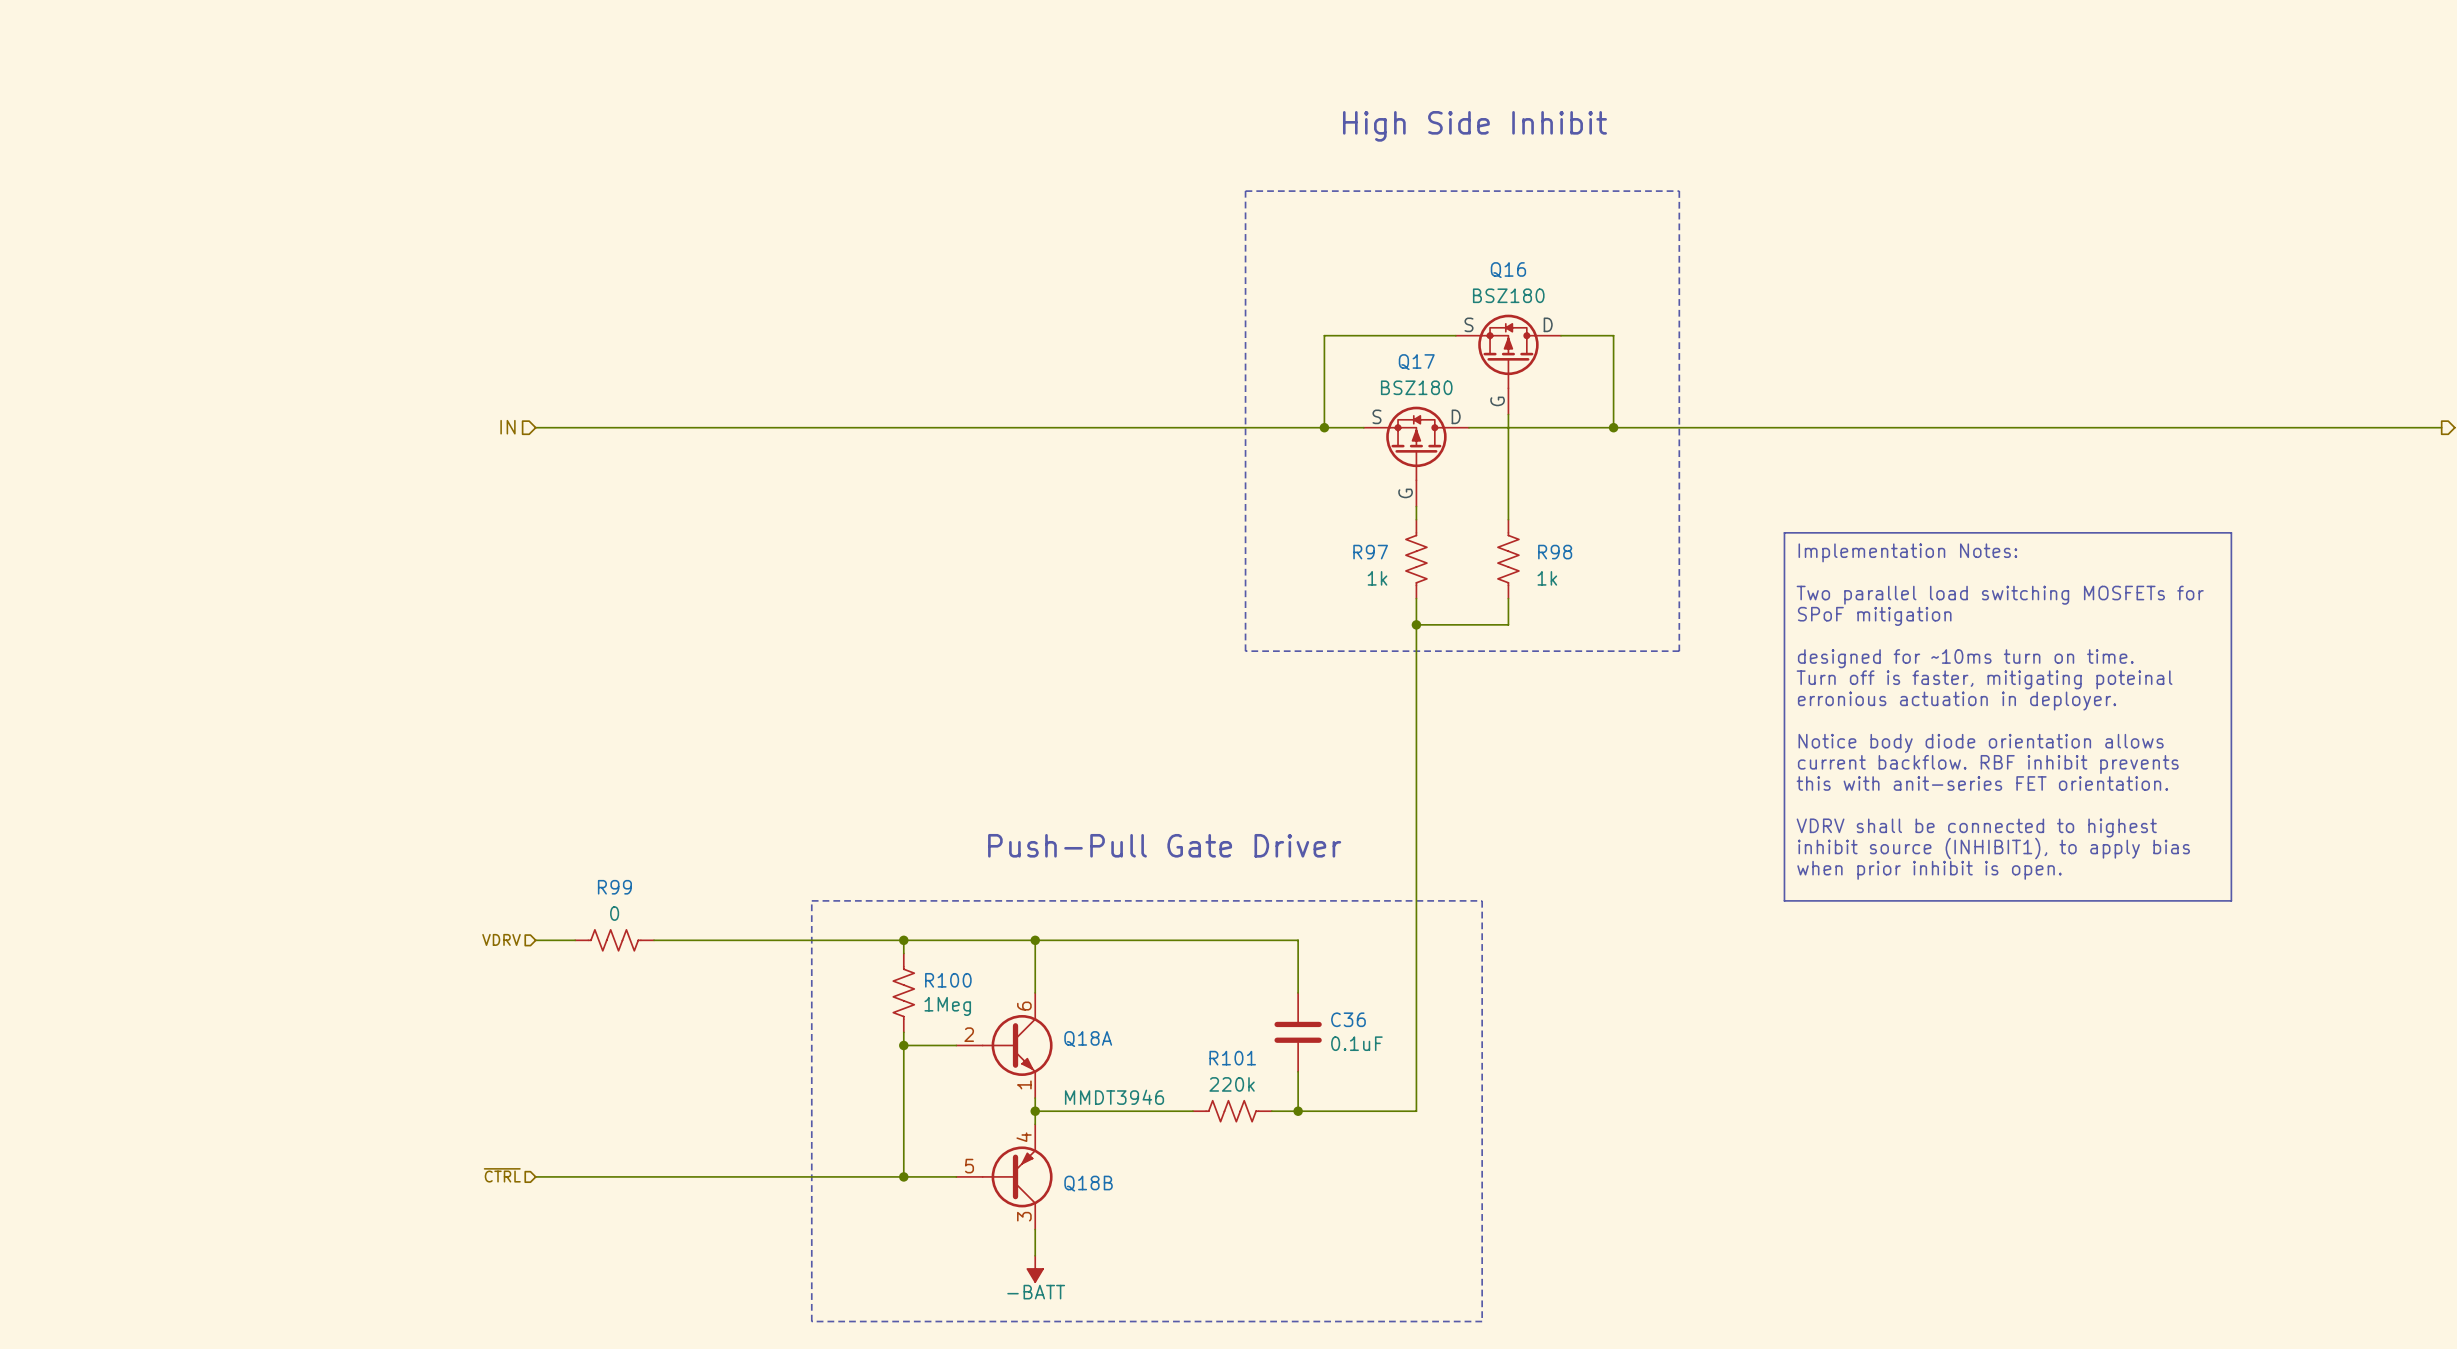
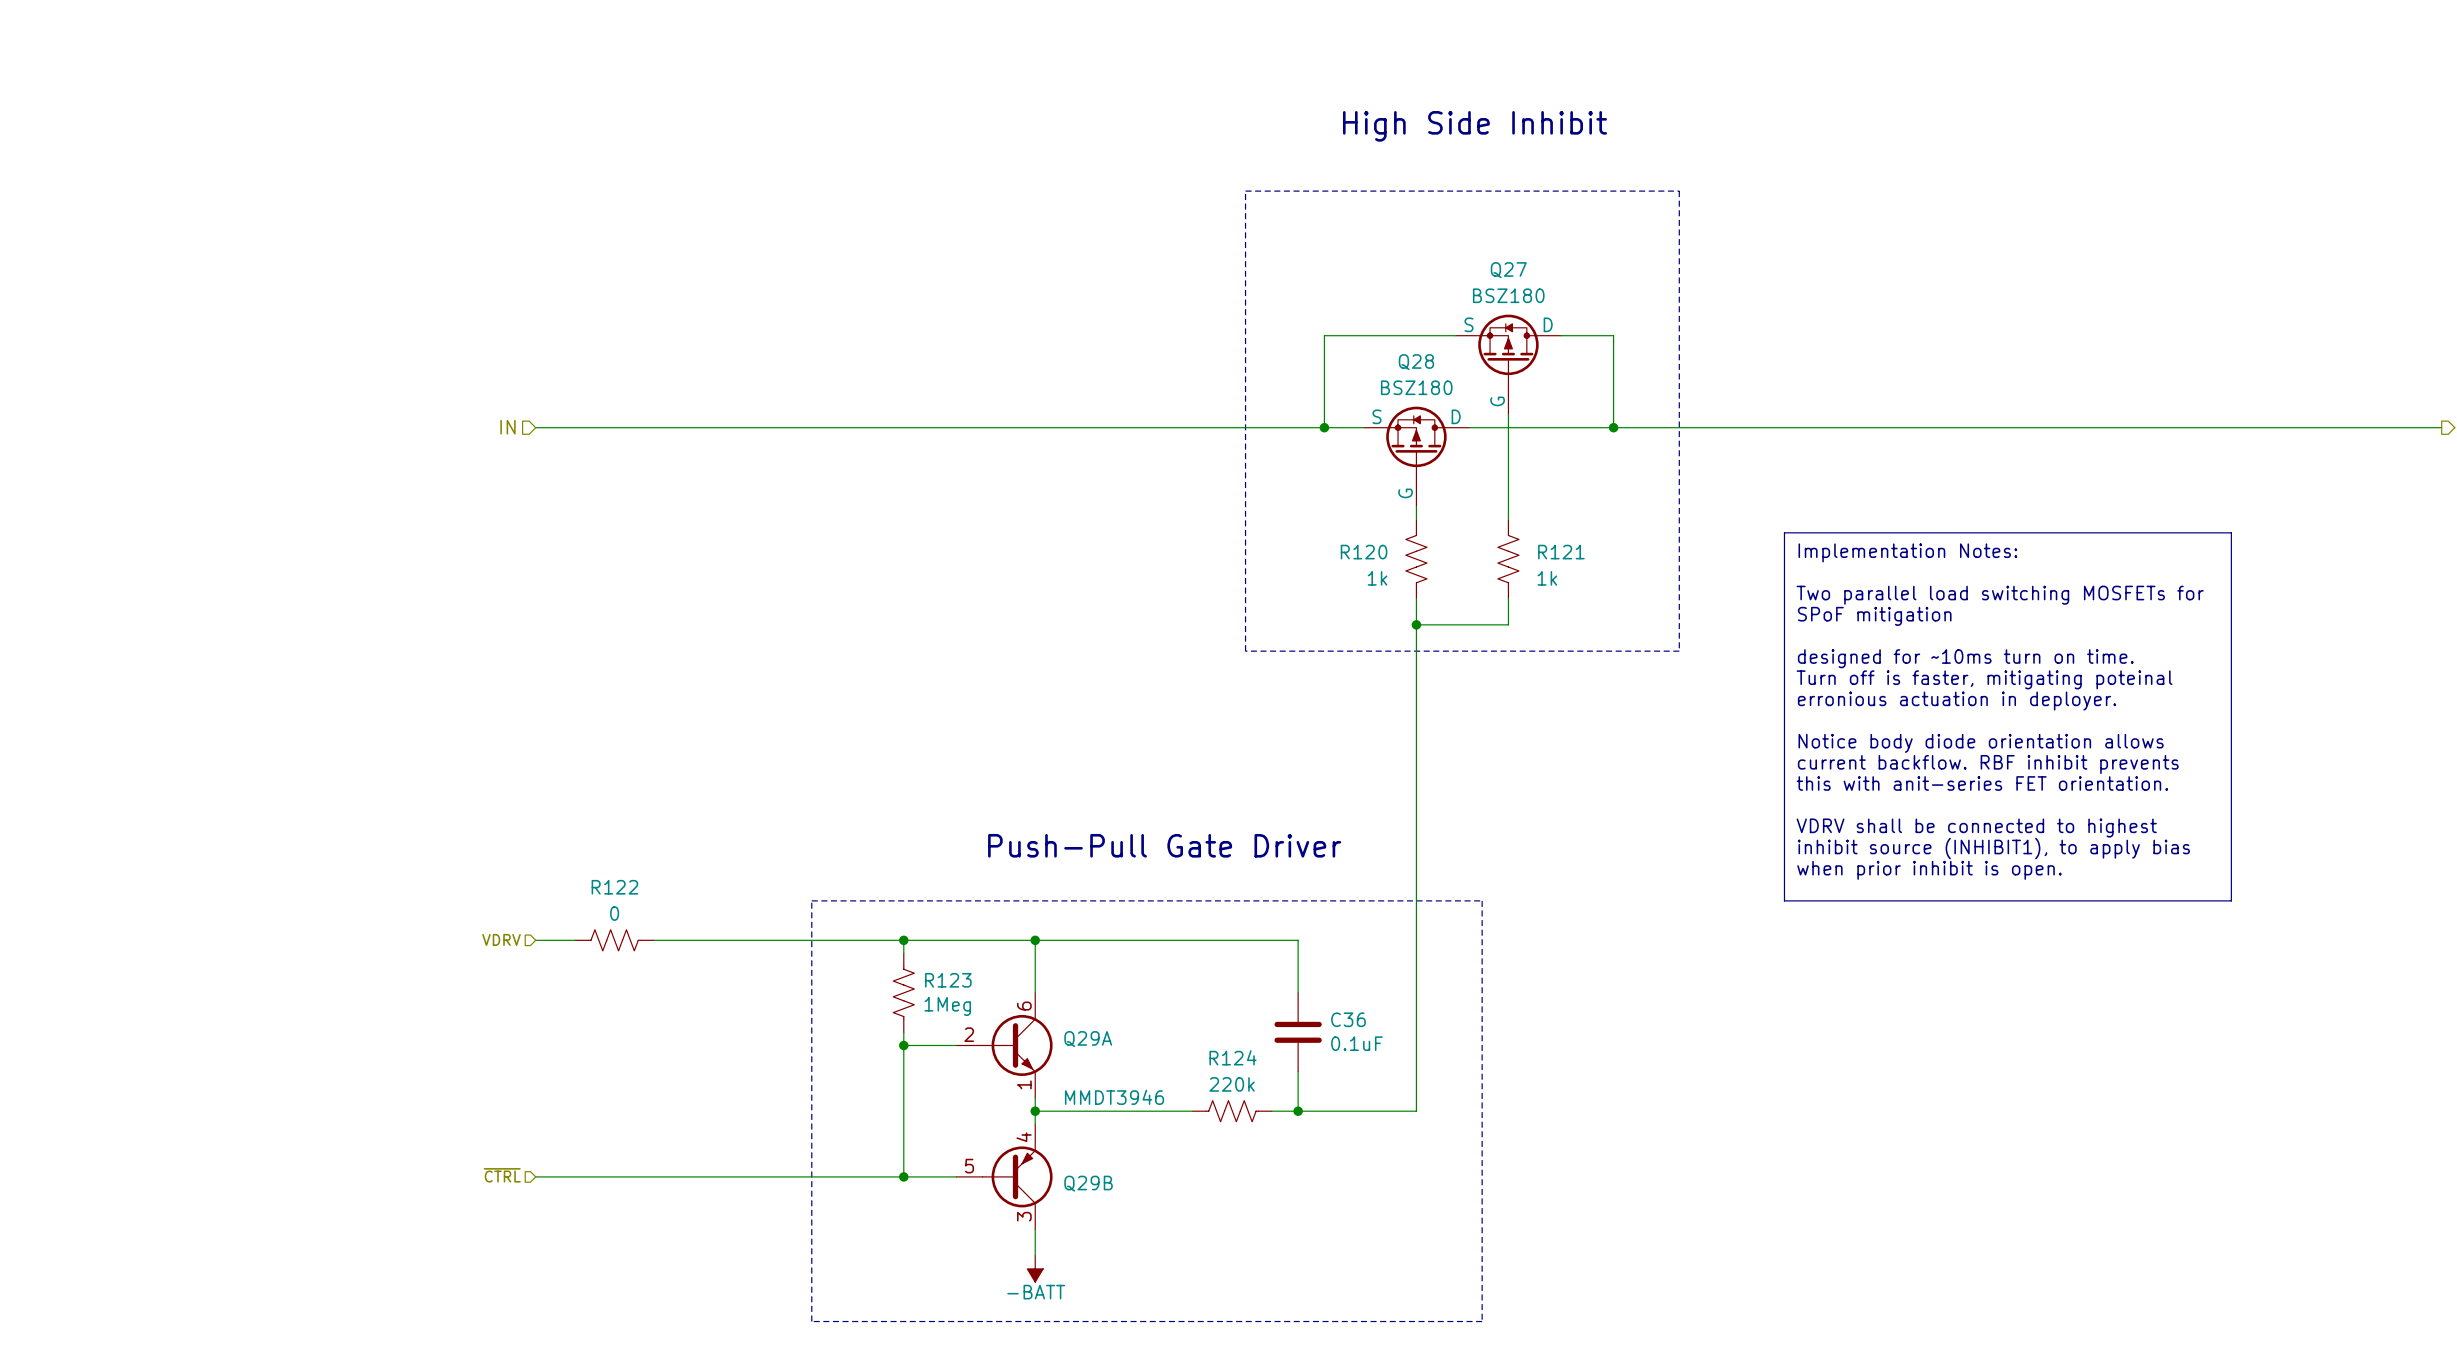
Q16 name: Q16 (1508, 270) -> Q27 (1508, 270)
Q17 name: Q17 (1416, 362) -> Q28 (1416, 362)
R97 name: R97 (1370, 552) -> R120 (1364, 552)
R98 name: R98 (1555, 552) -> R121 (1561, 552)
R99 name: R99 (614, 887) -> R122 (614, 887)
R100 name: R100 (948, 980) -> R123 (948, 980)
Q18A name: Q18A (1088, 1039) -> Q29A (1088, 1039)
R101 name: R101 (1232, 1058) -> R124 (1233, 1057)
Q18B name: Q18B (1088, 1183) -> Q29B (1088, 1183)

